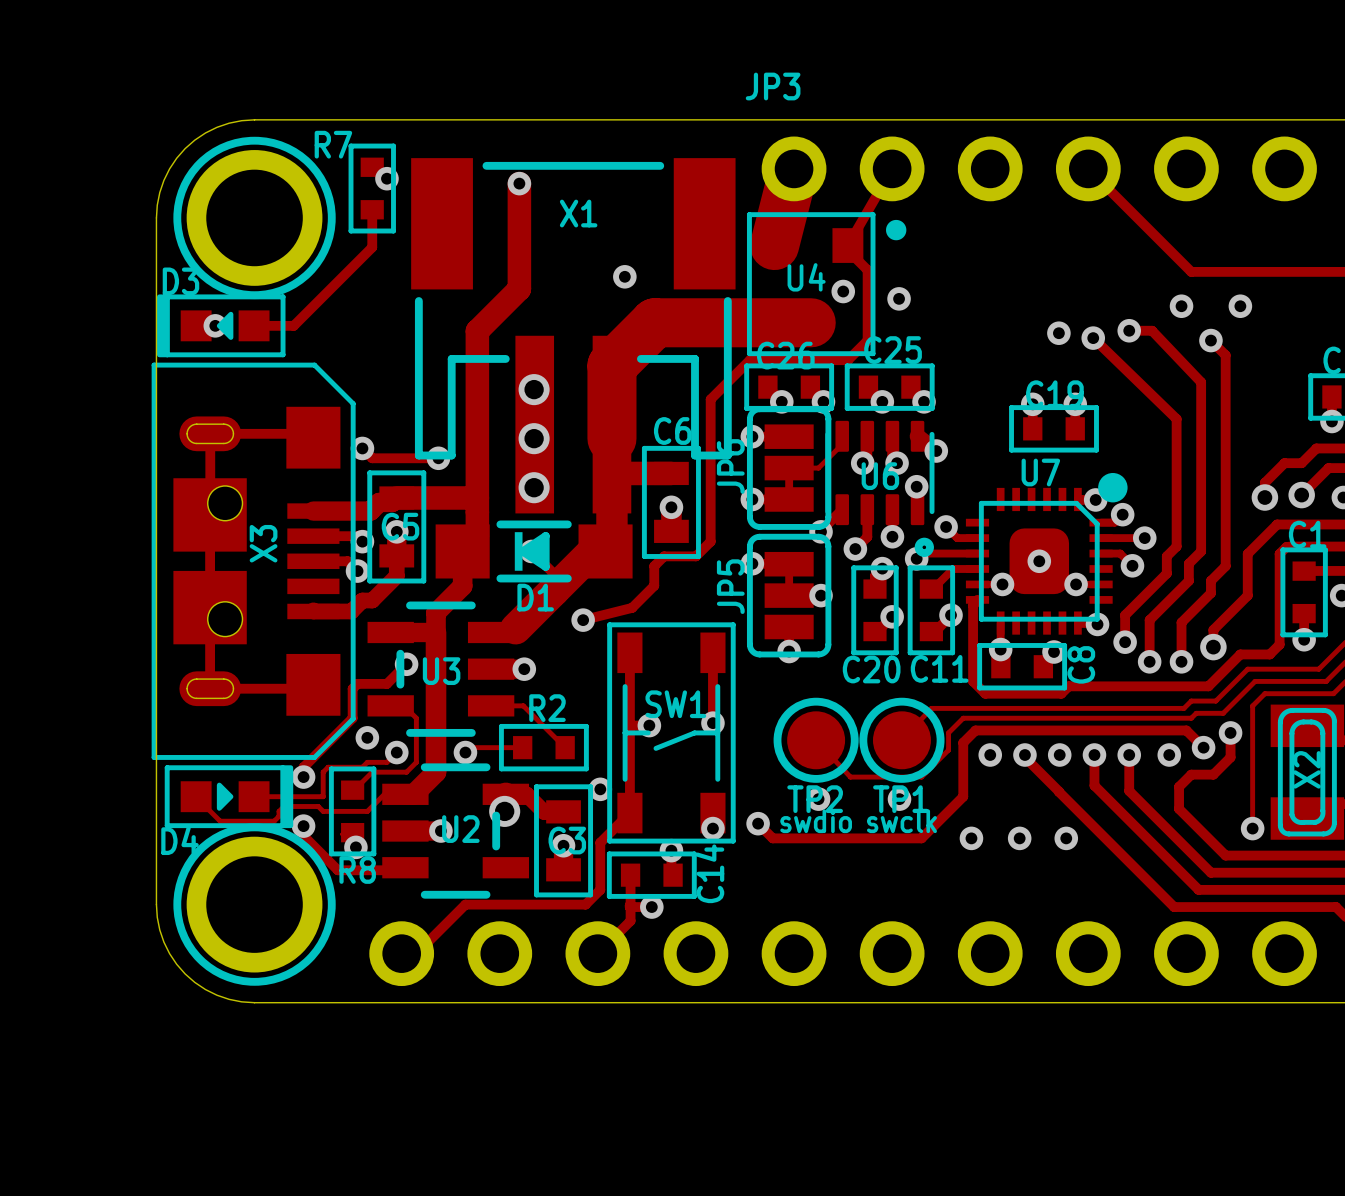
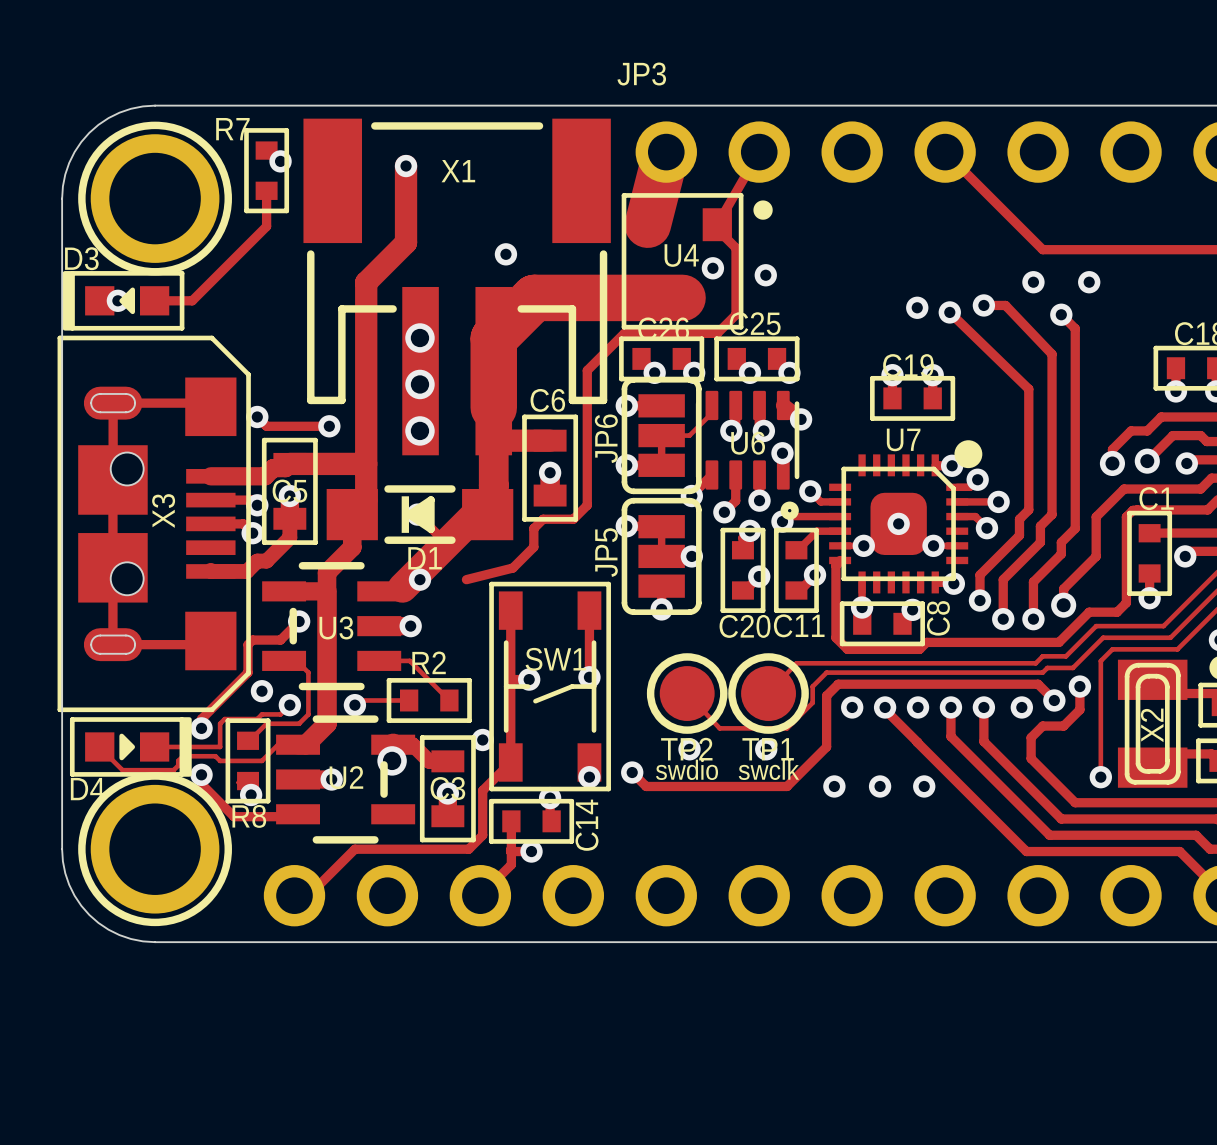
track: (519, 264) (519, 289) (477, 331) -> (406, 242) (366, 282) (366, 305)
X1 position: (573, 335) -> (457, 286)
via: none -> (419, 337)
via: (534, 389) -> none
via: none -> (419, 384)
via: (534, 438) -> none
via: none -> (419, 430)
via: (534, 487) -> none
via position: (583, 620) -> (419, 579)

